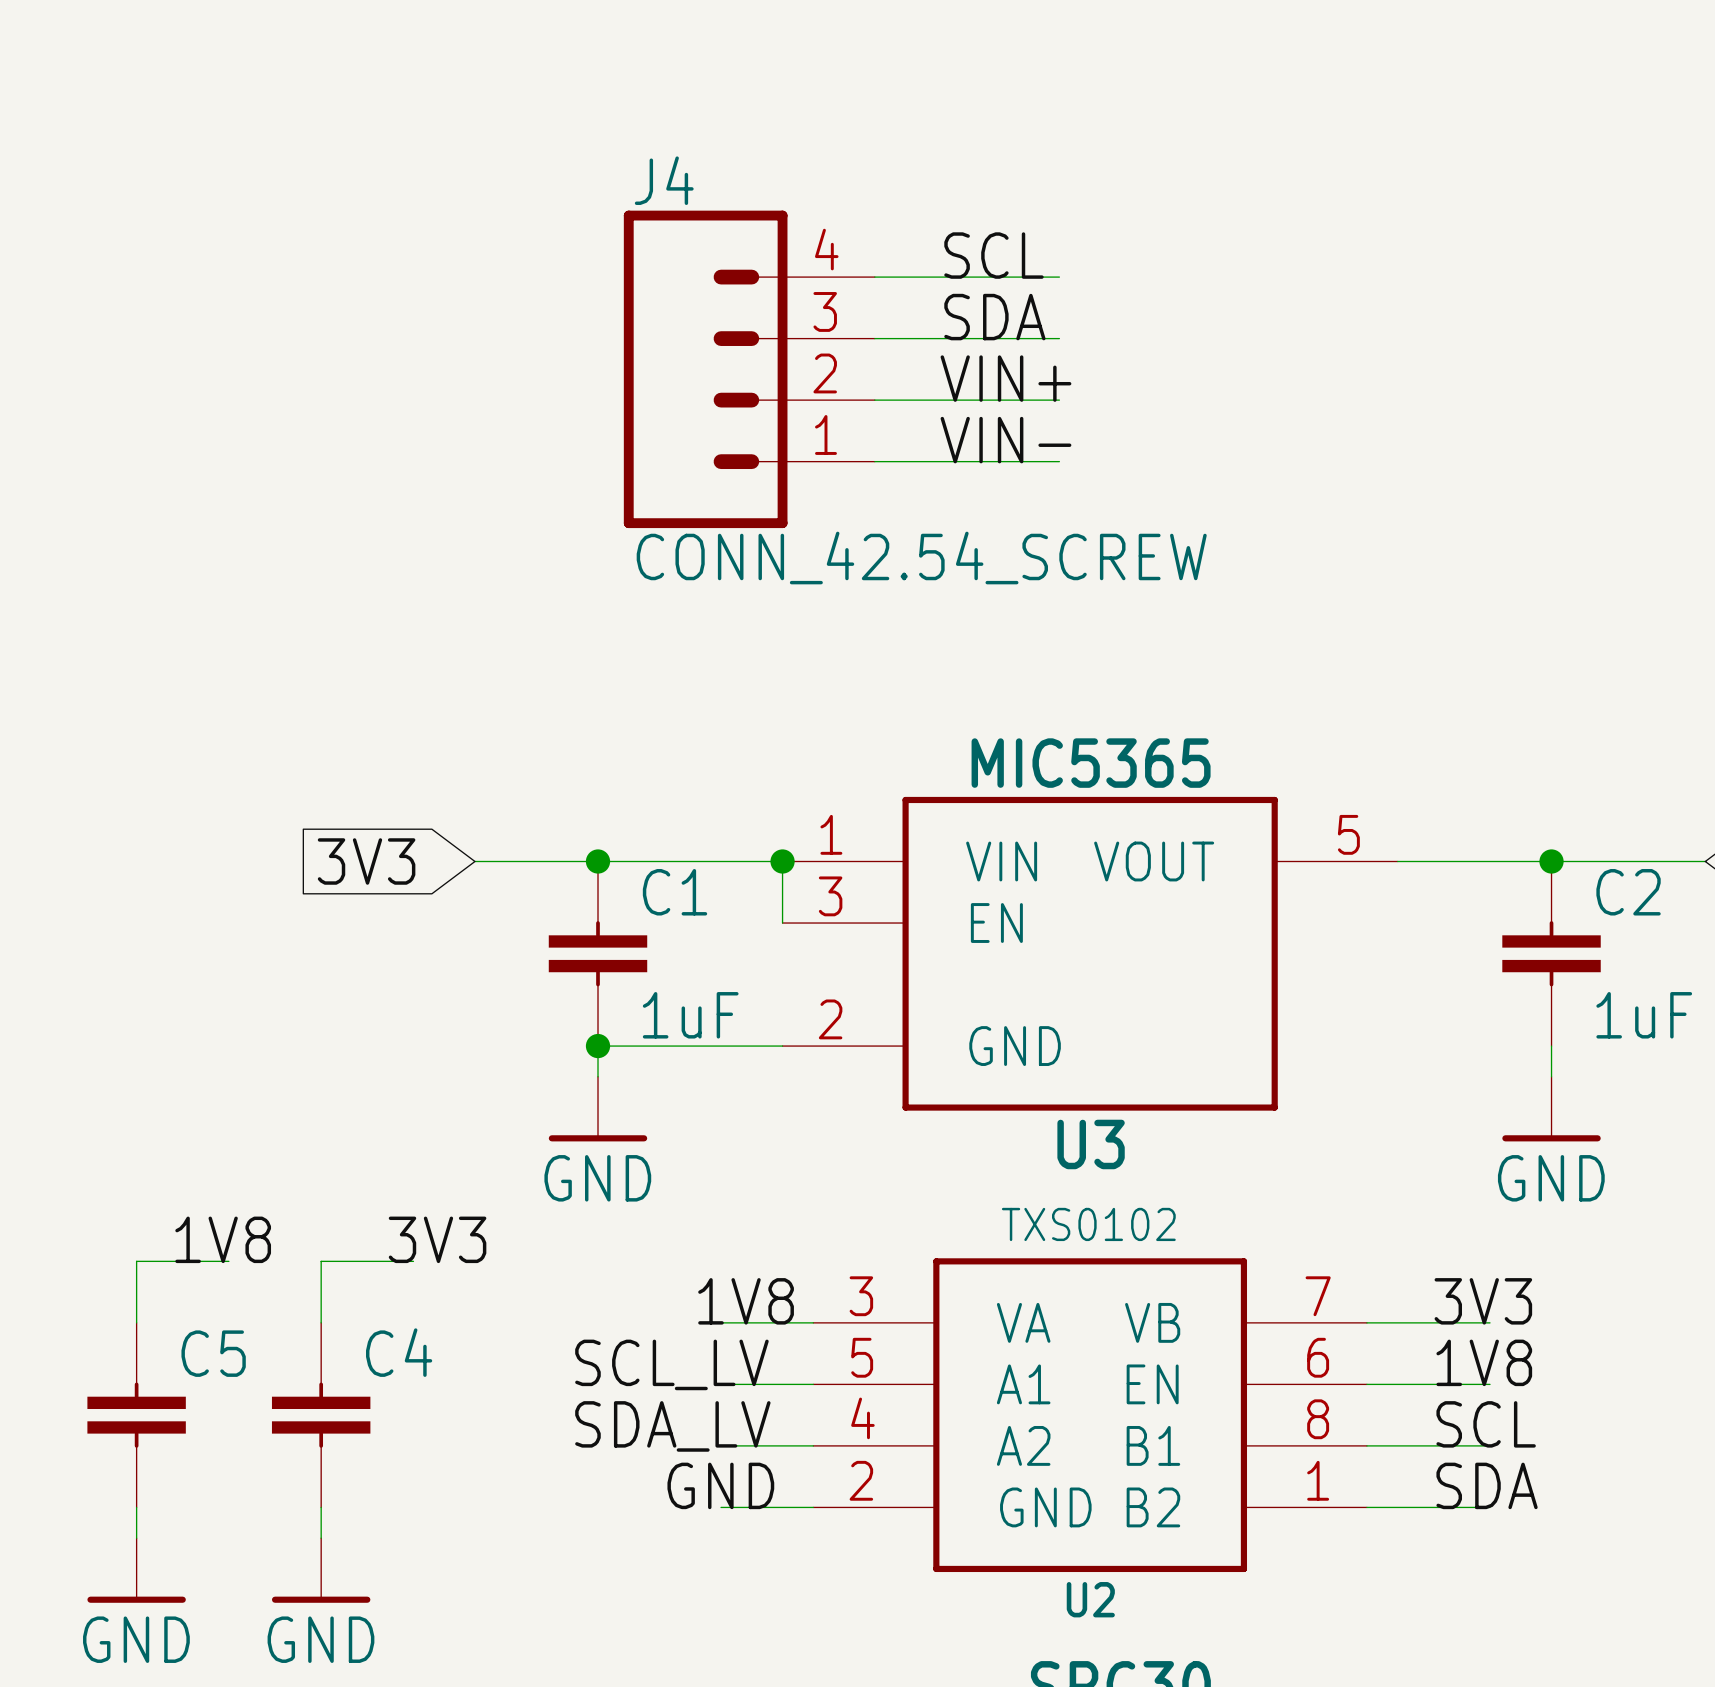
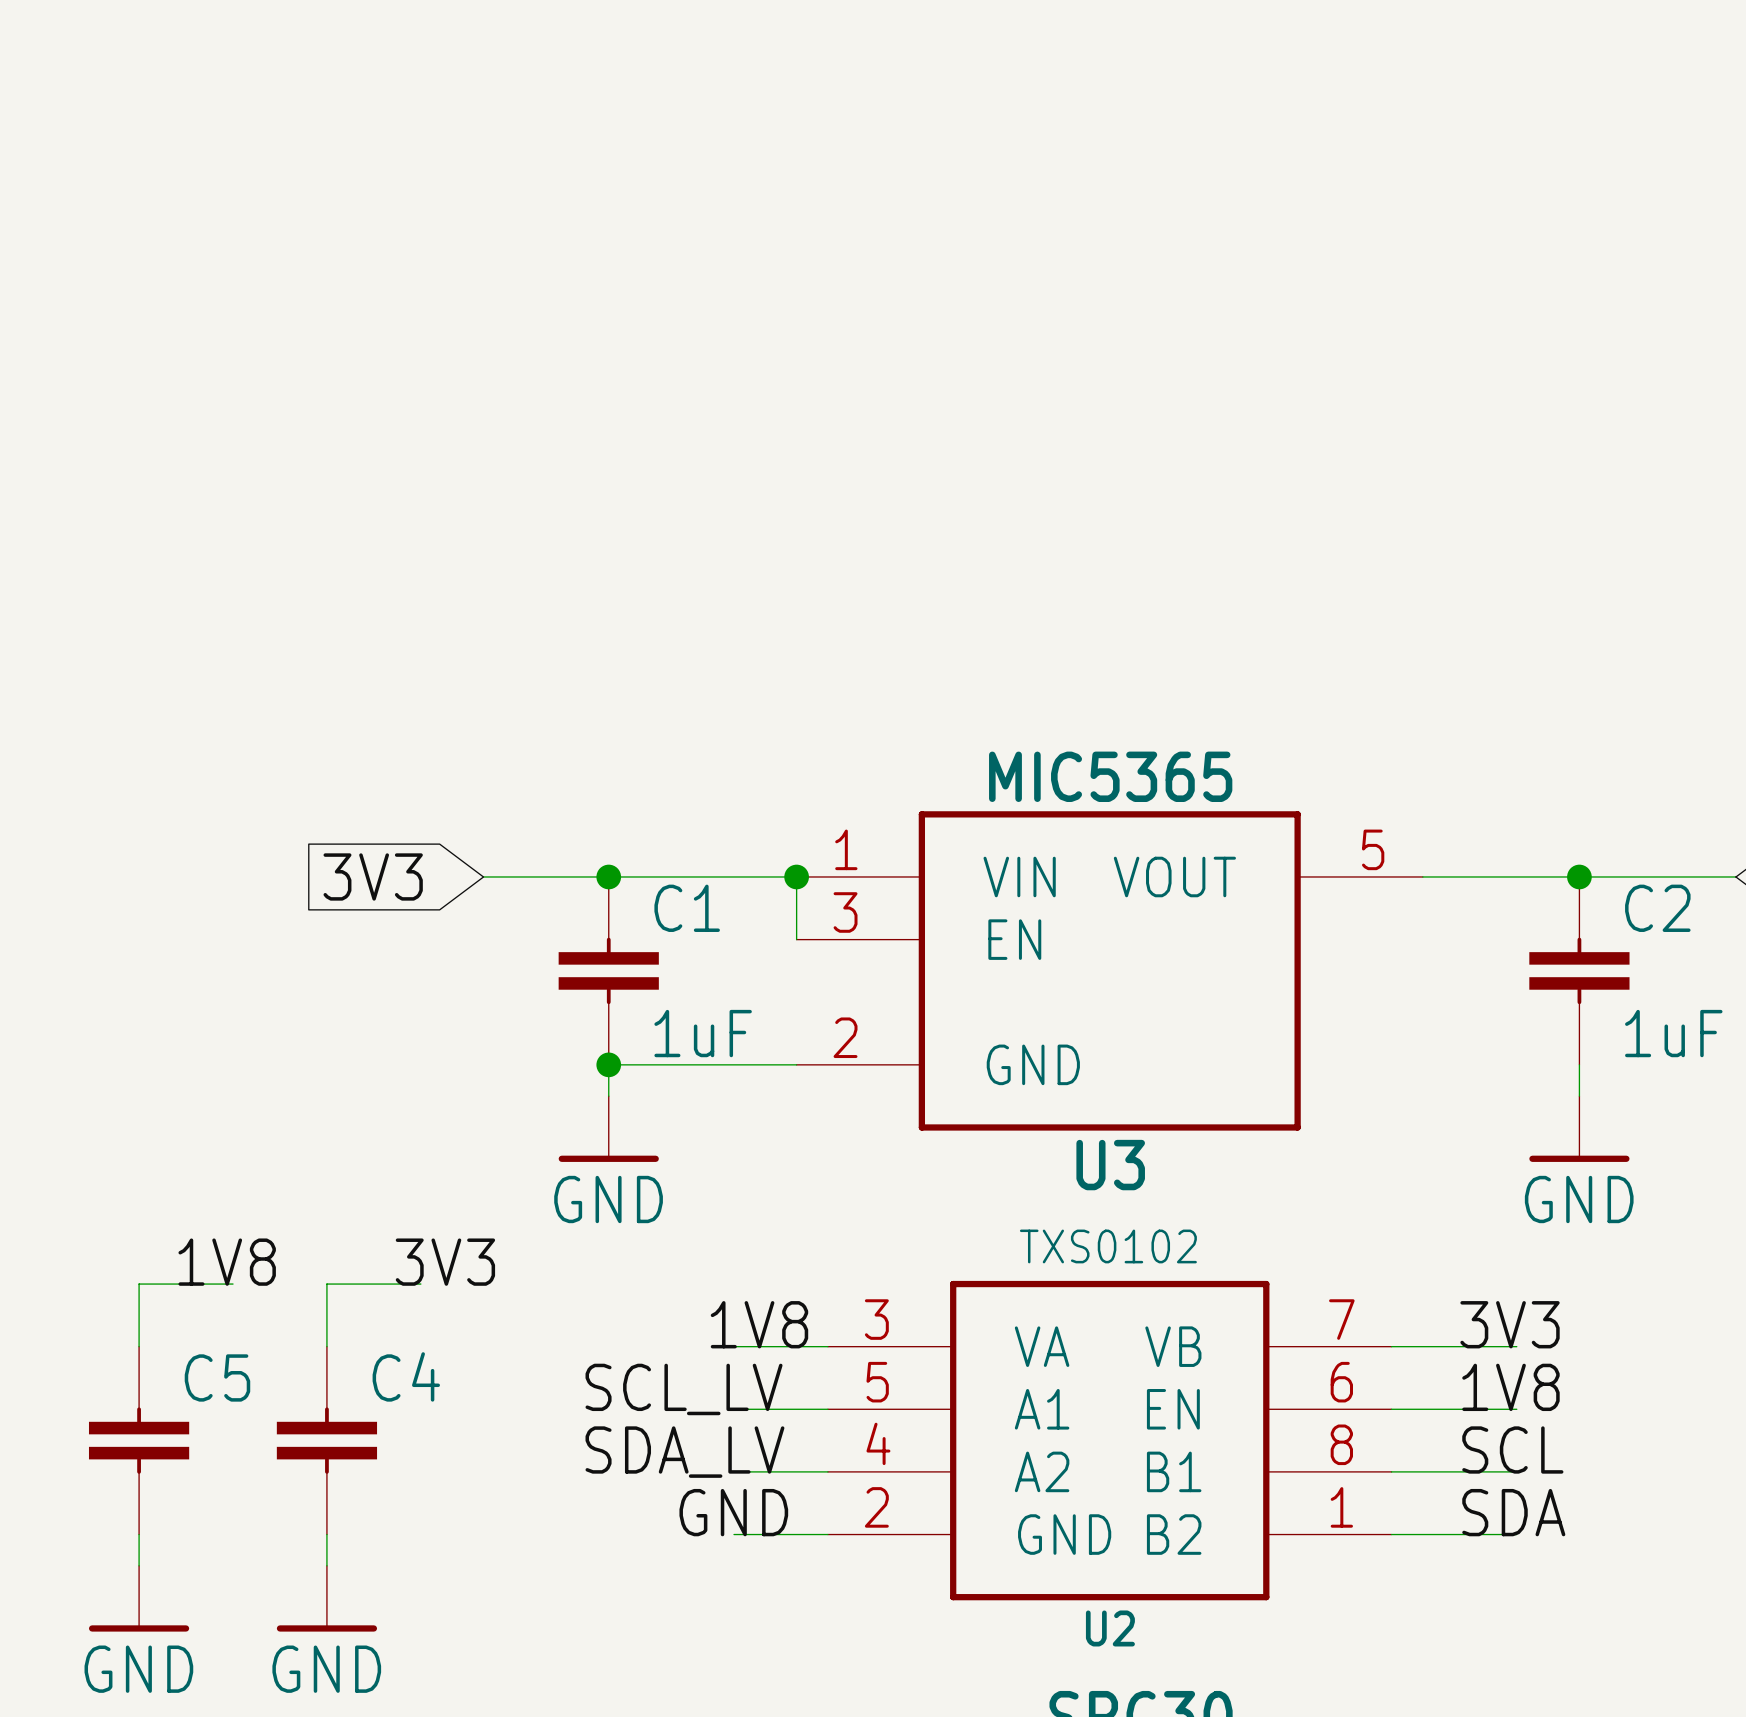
label: SCL (993, 255) -> none
wire: (874, 277) (1059, 277) -> none
label: SDA (994, 317) -> none
wire: (874, 338) (1059, 338) -> none
J4: CONN_42.54_SCREW (749, 369) -> none
label: VIN+ (1005, 378) -> none
wire: (874, 400) (1059, 400) -> none
label: VIN- (1005, 440) -> none
wire: (874, 461) (1059, 461) -> none

